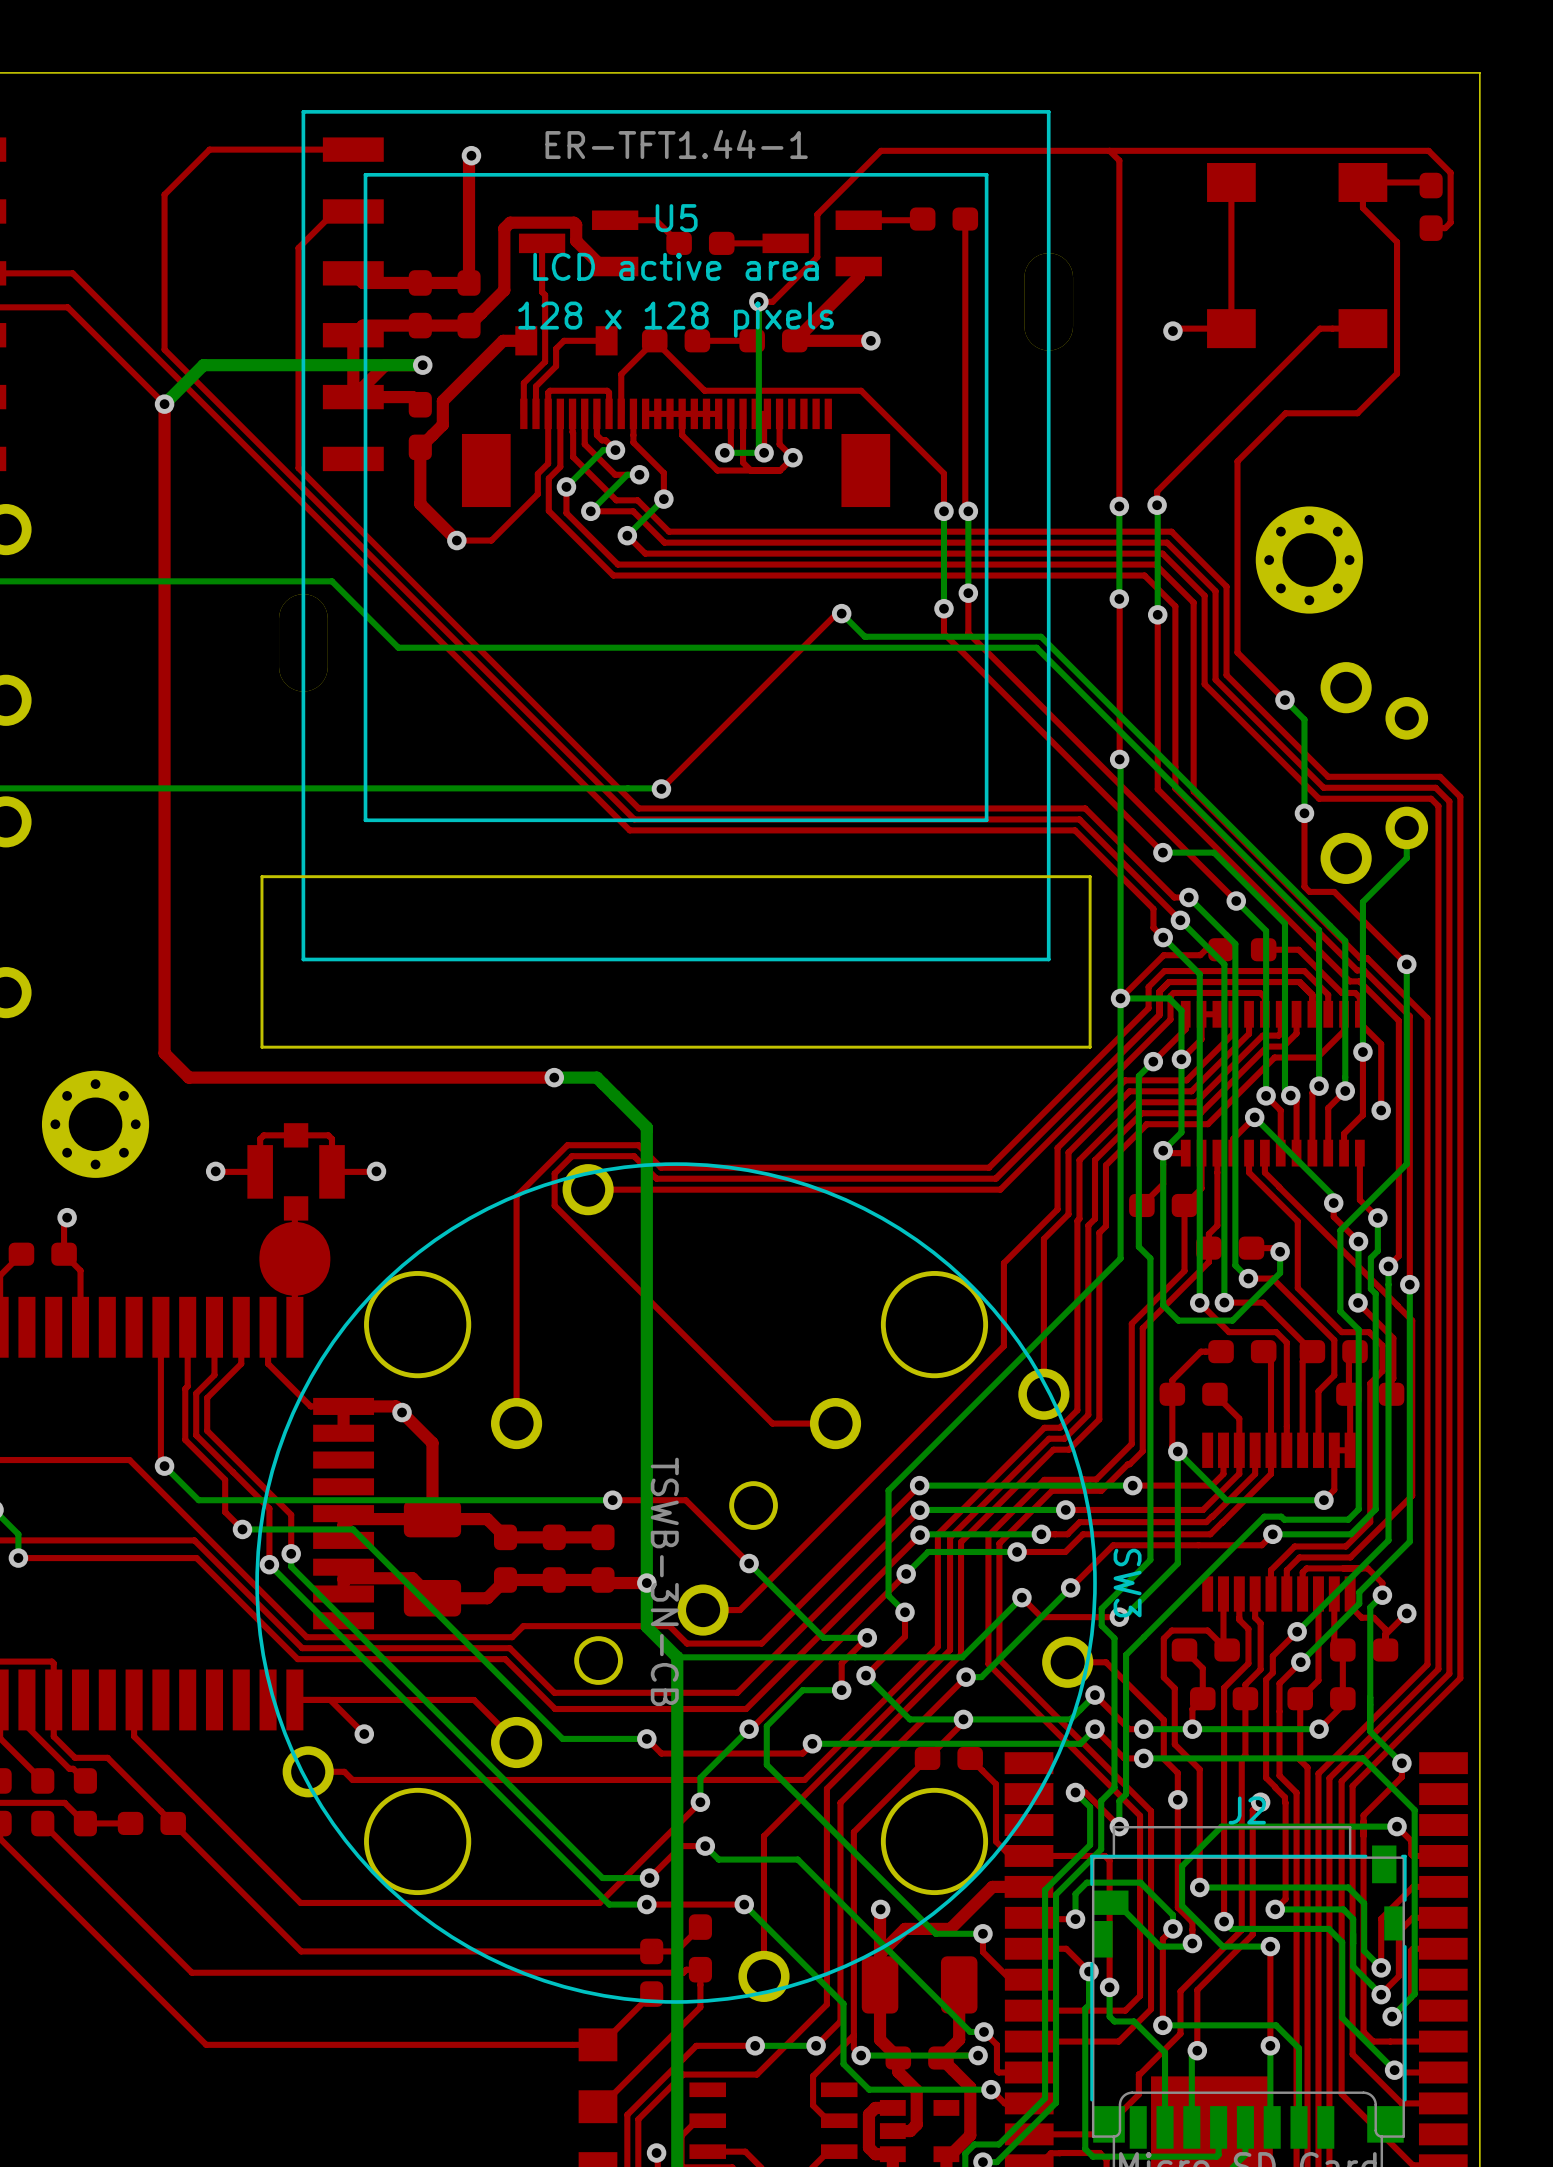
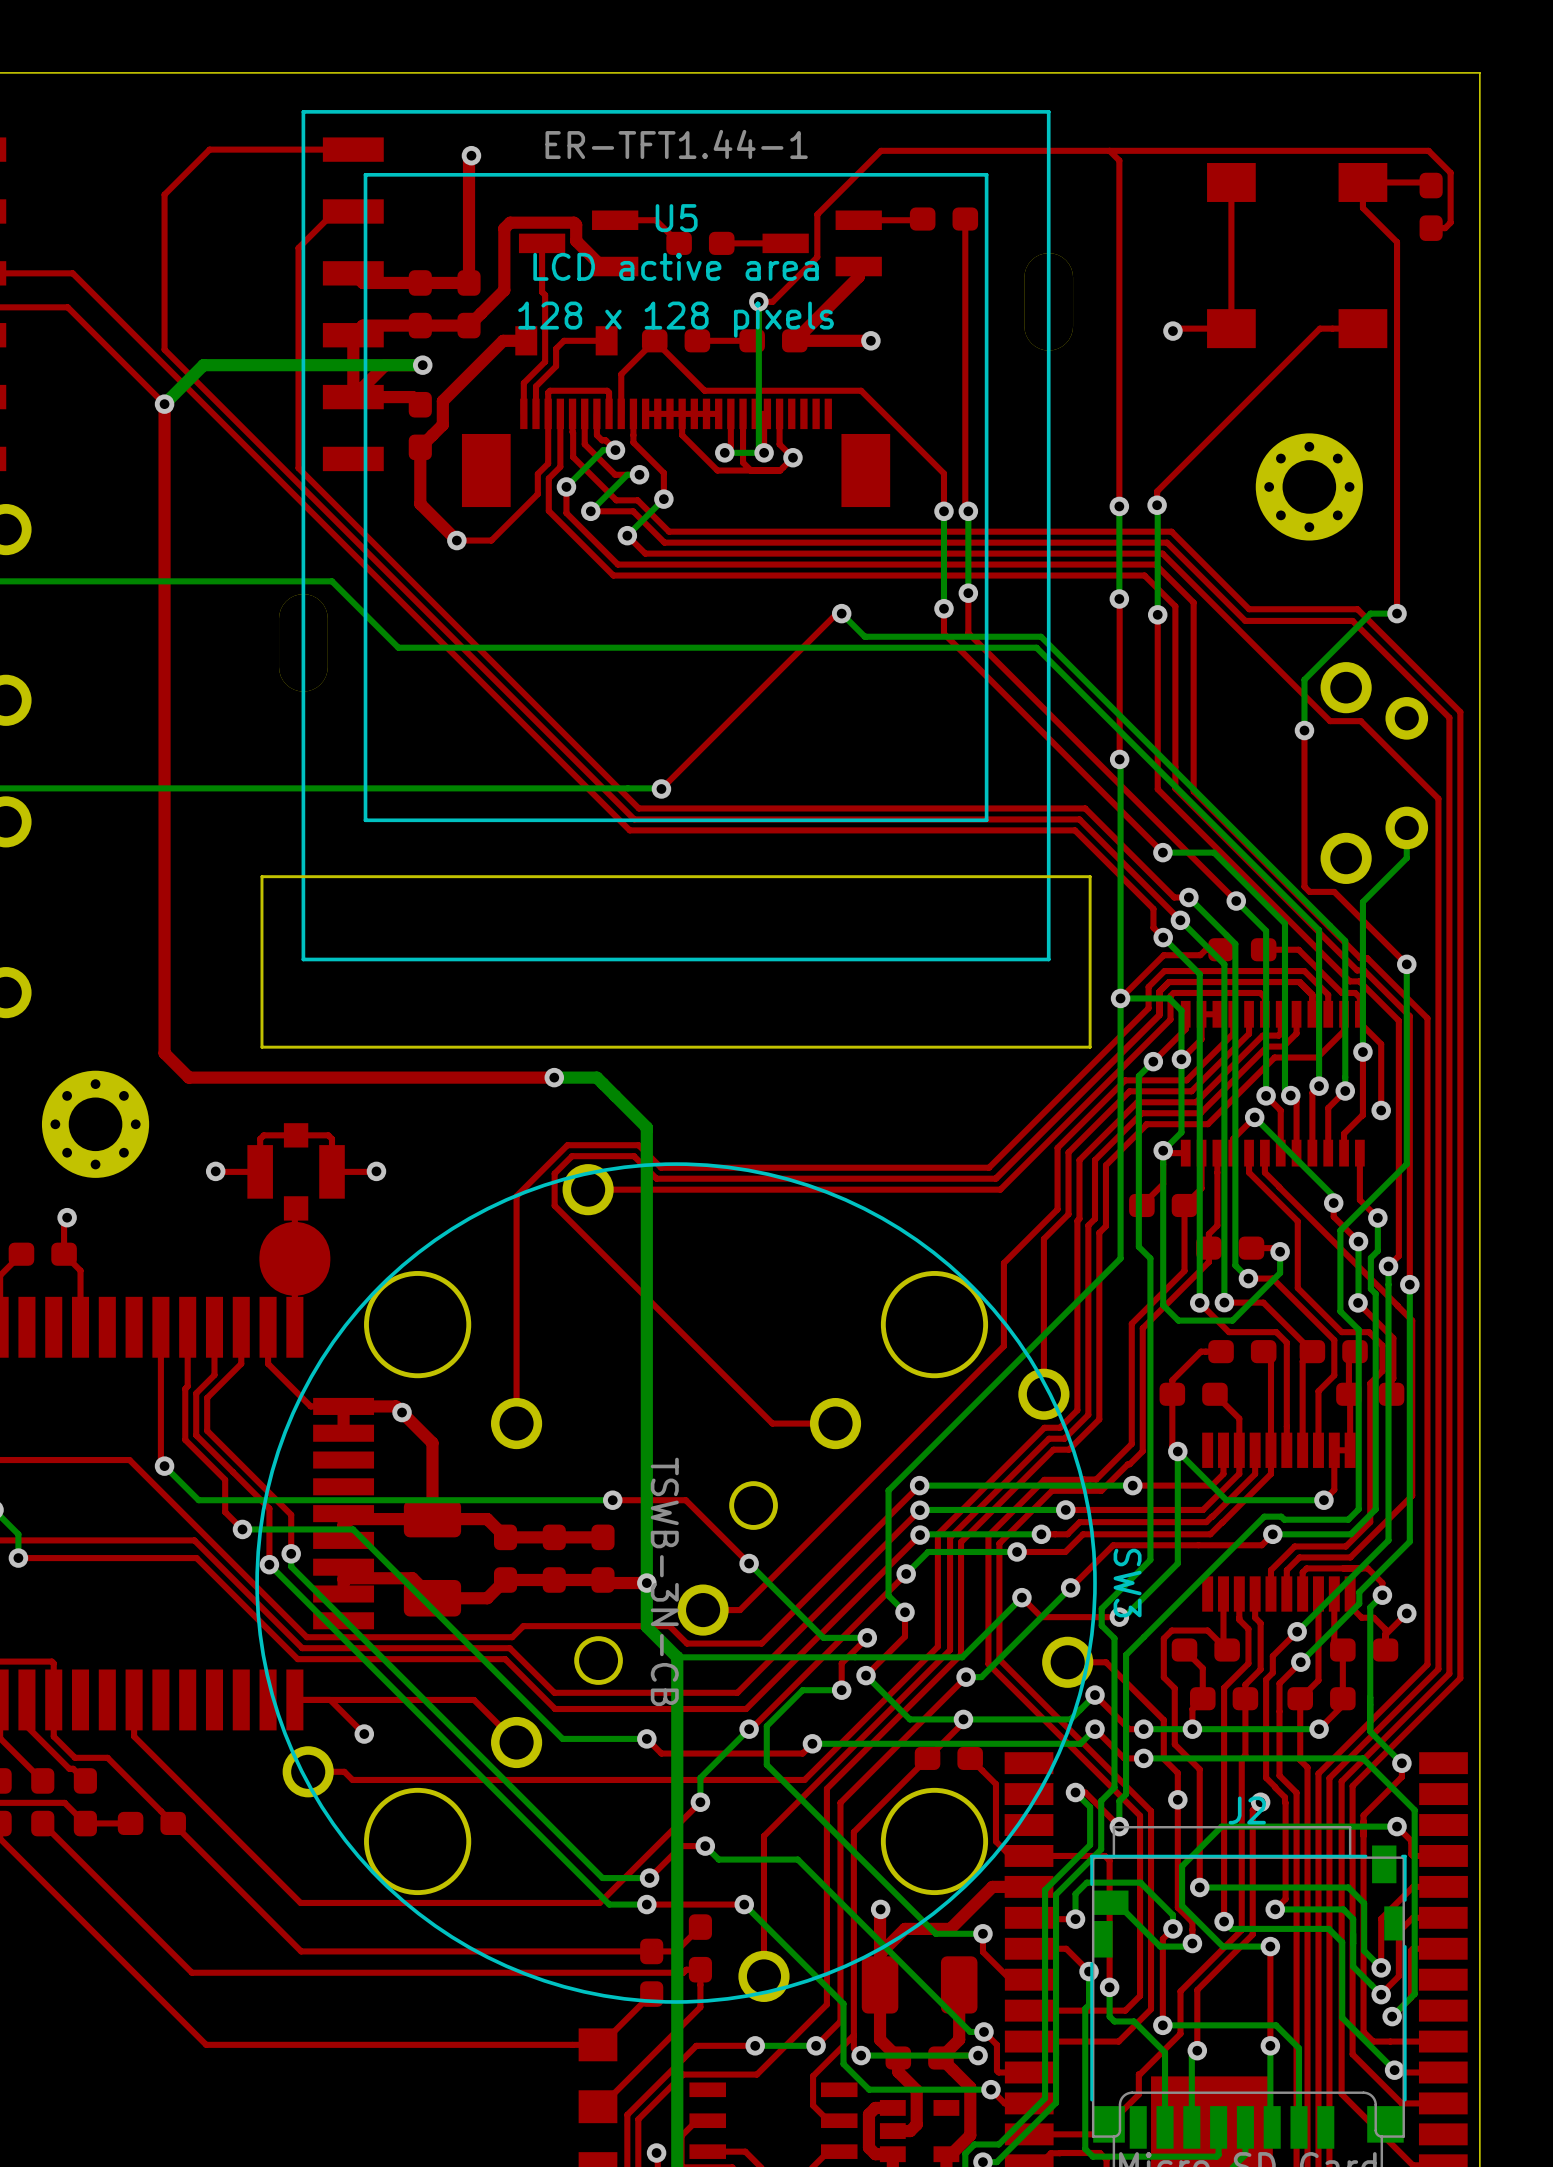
top track: (1397, 373) (1357, 413) (1285, 413) (1237, 461) (1237, 652) (1284, 700) -> (1397, 373) (1397, 613)
part position: (1309, 560) -> (1309, 486)
top track: (1226, 586) (1226, 675) (1328, 776) (1440, 776) (1460, 796) -> (1226, 586) (1249, 609) (1357, 609) (1460, 712) (1460, 796)
top track: (1215, 591) (1215, 679) (1323, 787) (1435, 787) (1449, 801) -> (1215, 591) (1245, 620) (1352, 620) (1449, 717) (1449, 801)
top track: (1204, 595) (1204, 684) (1319, 798) (1431, 798) (1438, 806) -> (1204, 595) (1330, 721) (1360, 721) (1438, 798) (1438, 806)
via: none -> (1397, 613)
bottom track: (1284, 700) (1304, 719) -> (1397, 613) (1370, 613) (1304, 679) (1304, 719)
via position: (1284, 700) -> (1304, 730)
top track: none -> (1304, 730) (1304, 813)
bottom track: (1304, 730) (1304, 813) -> none
via: (1304, 813) -> none

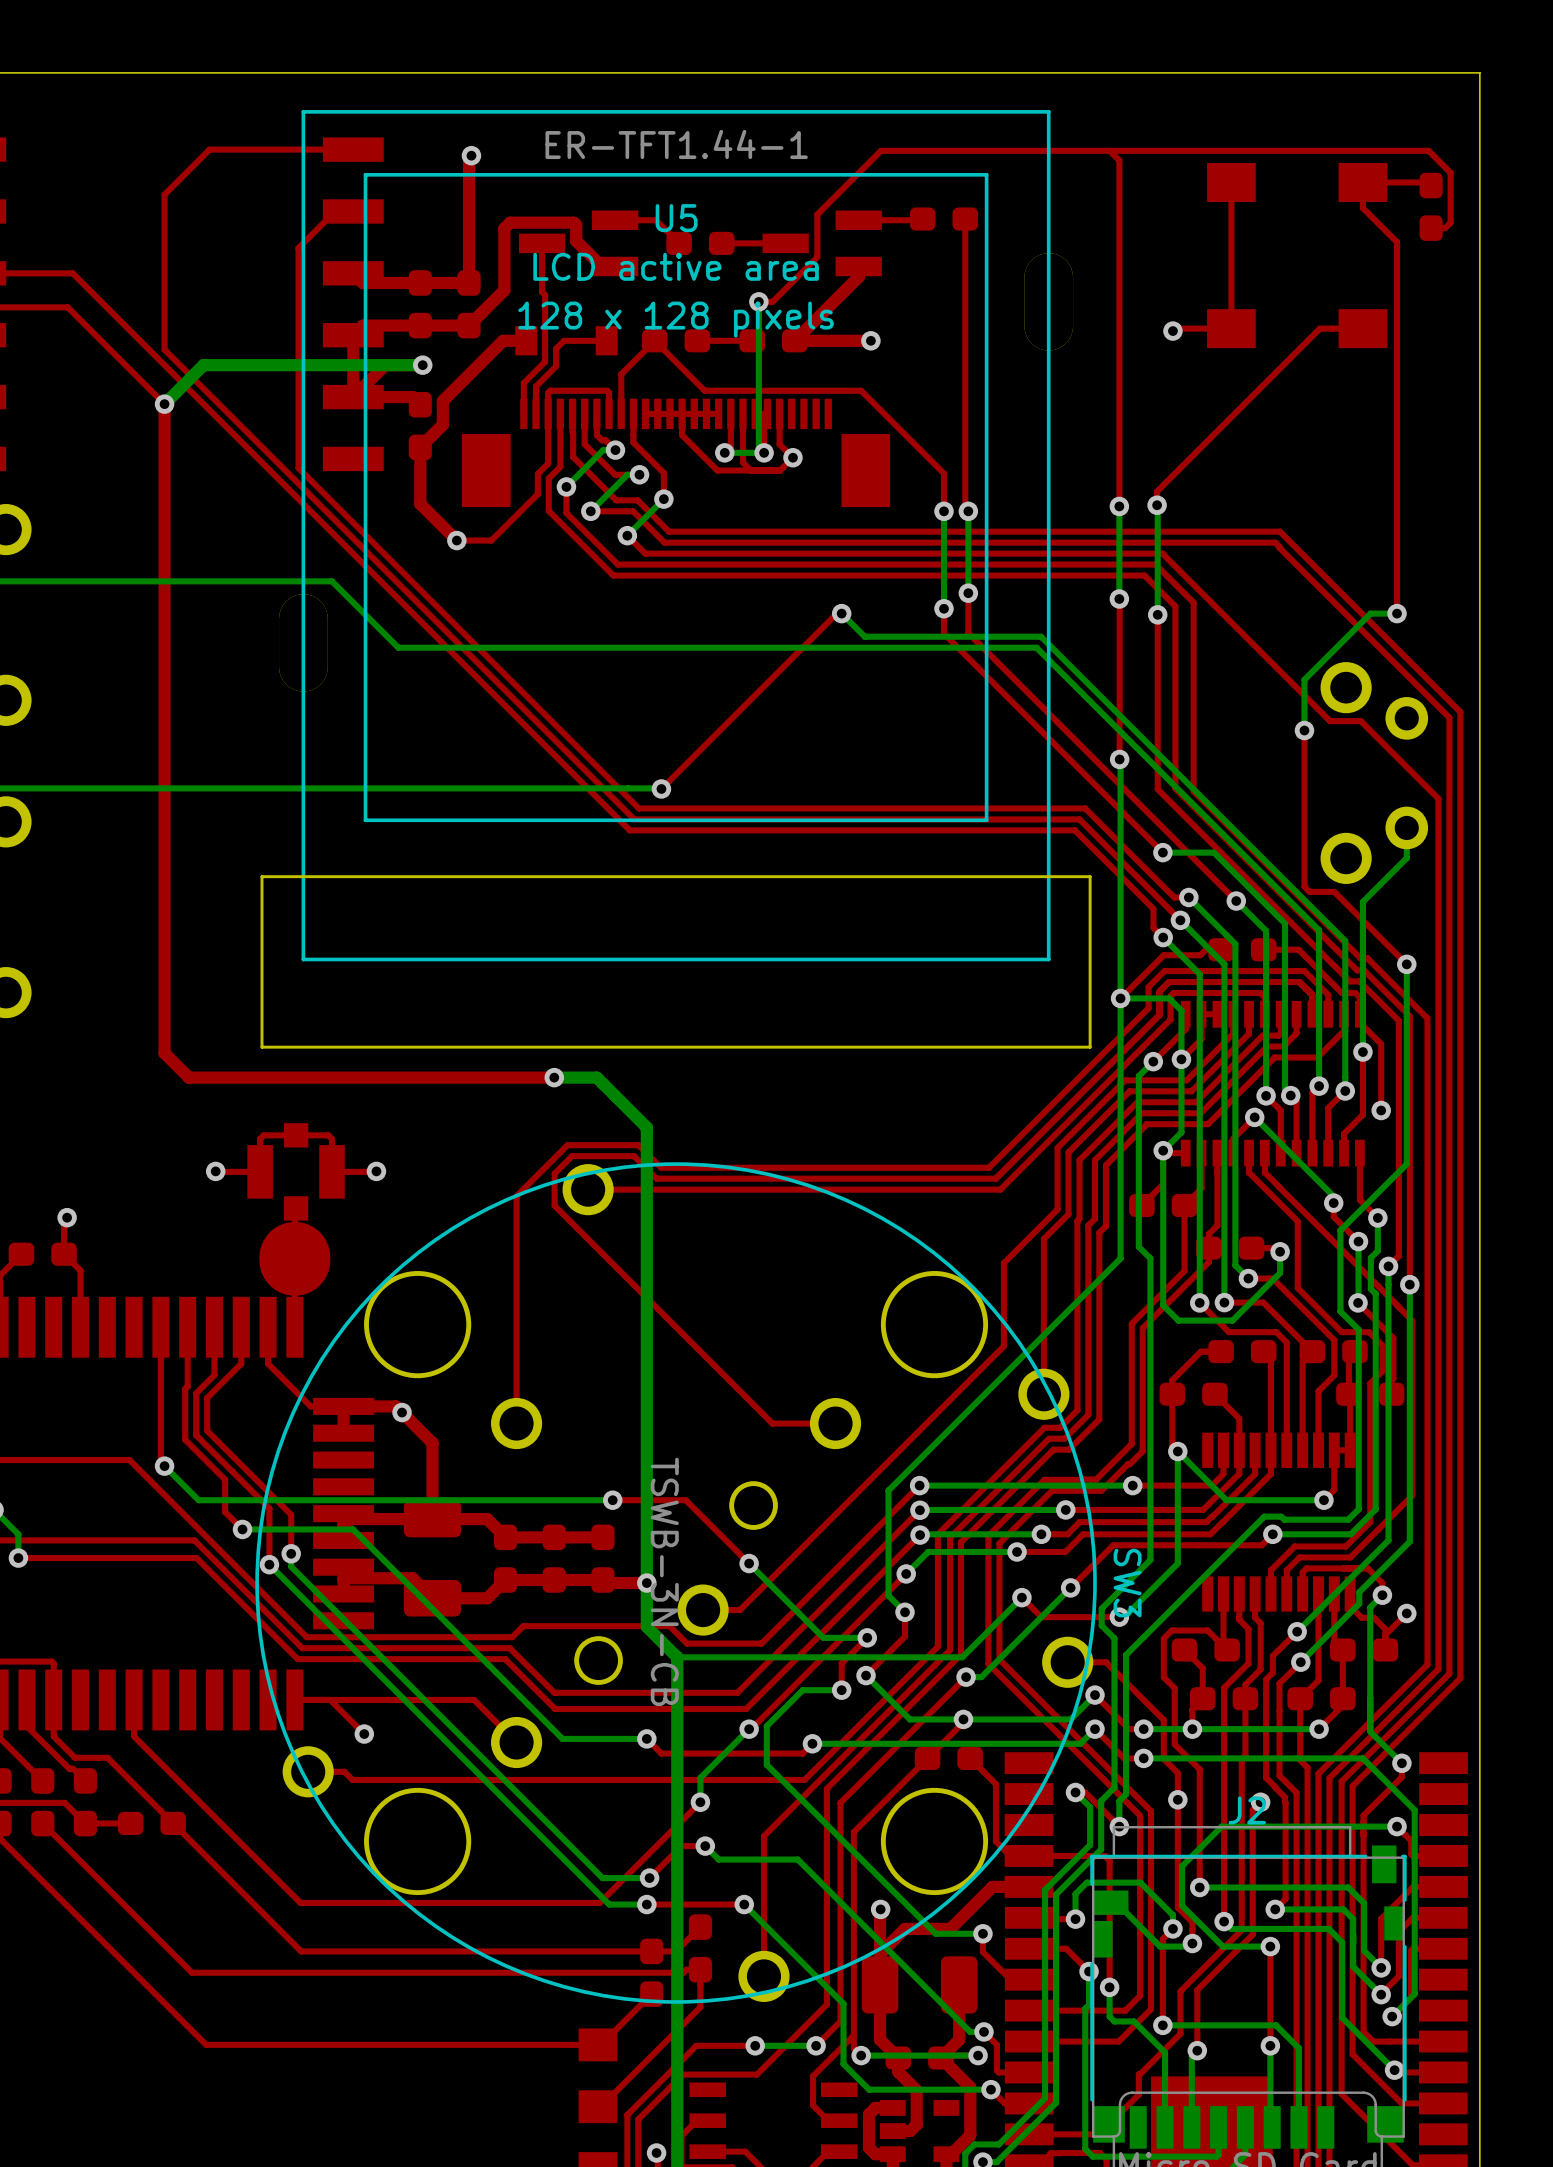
part: (1309, 486) -> none
top track: (1171, 531) (1249, 609) (1357, 609) -> (1171, 531) (1279, 531) (1357, 609)
top track: (1167, 542) (1245, 620) (1352, 620) -> (1167, 542) (1275, 542) (1352, 620)
part: (95, 1124) -> none

